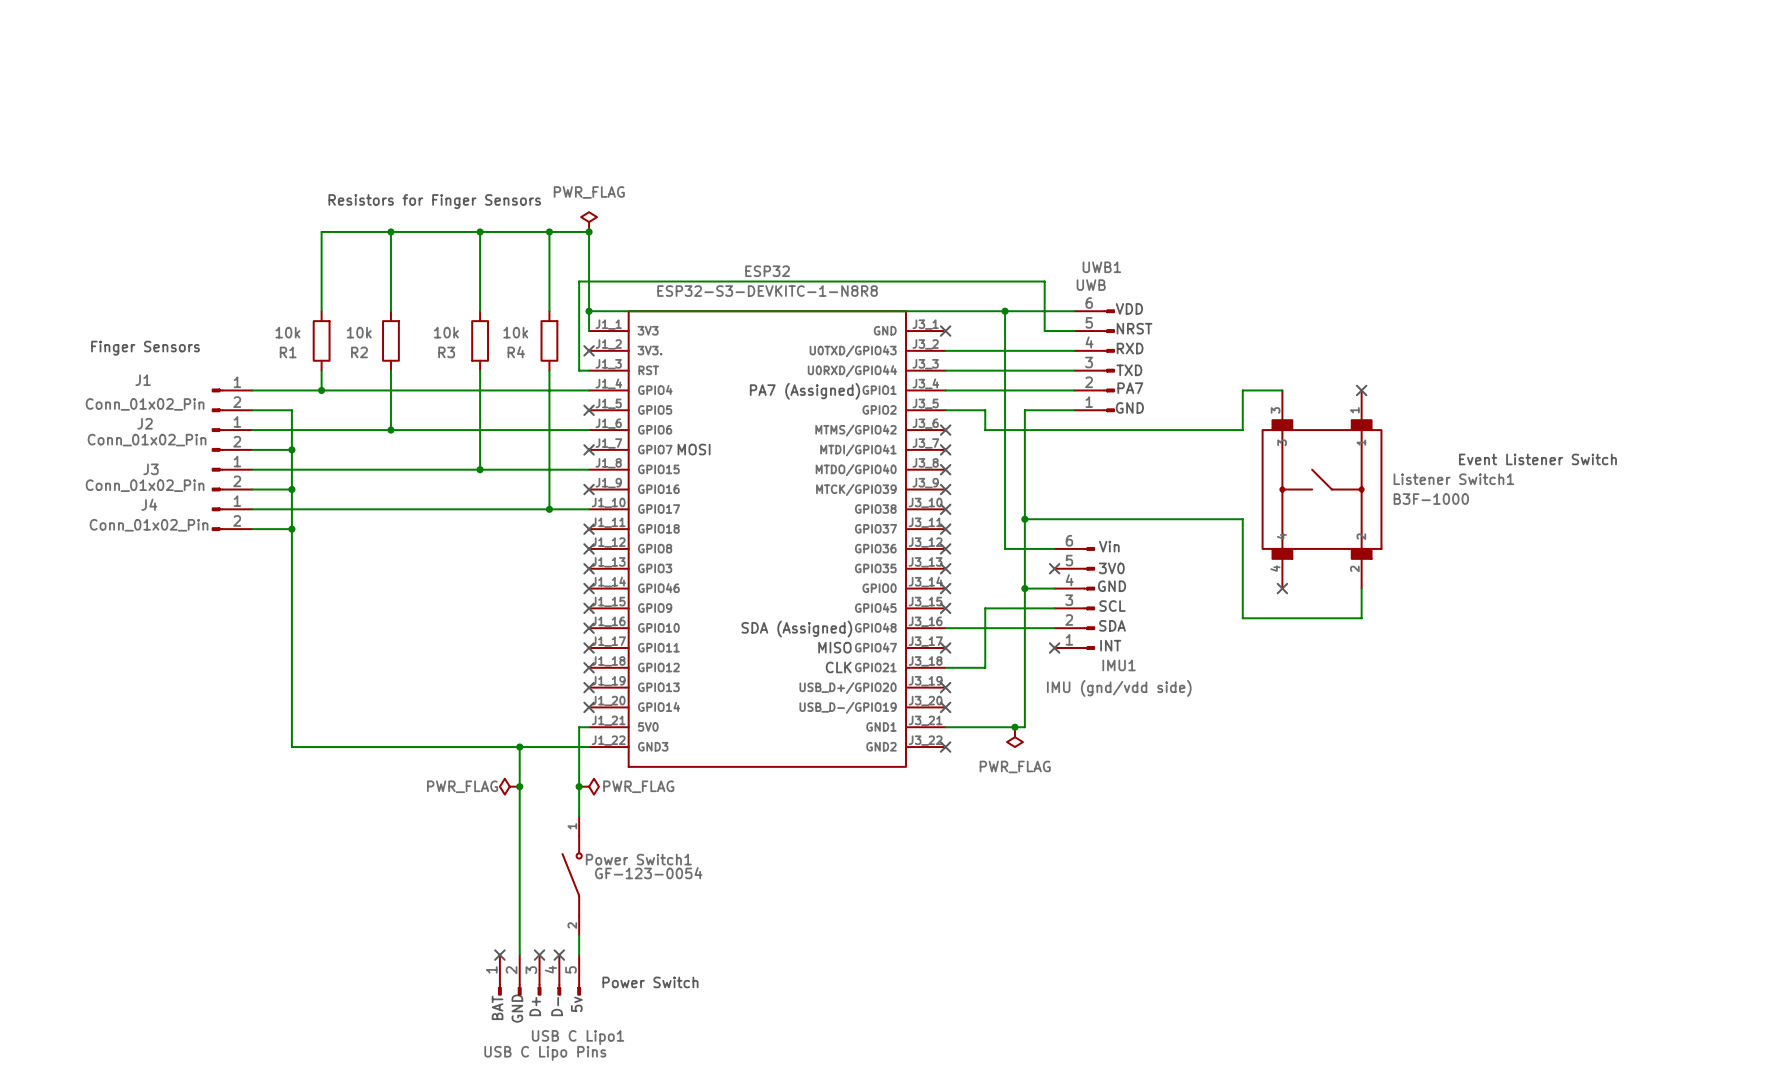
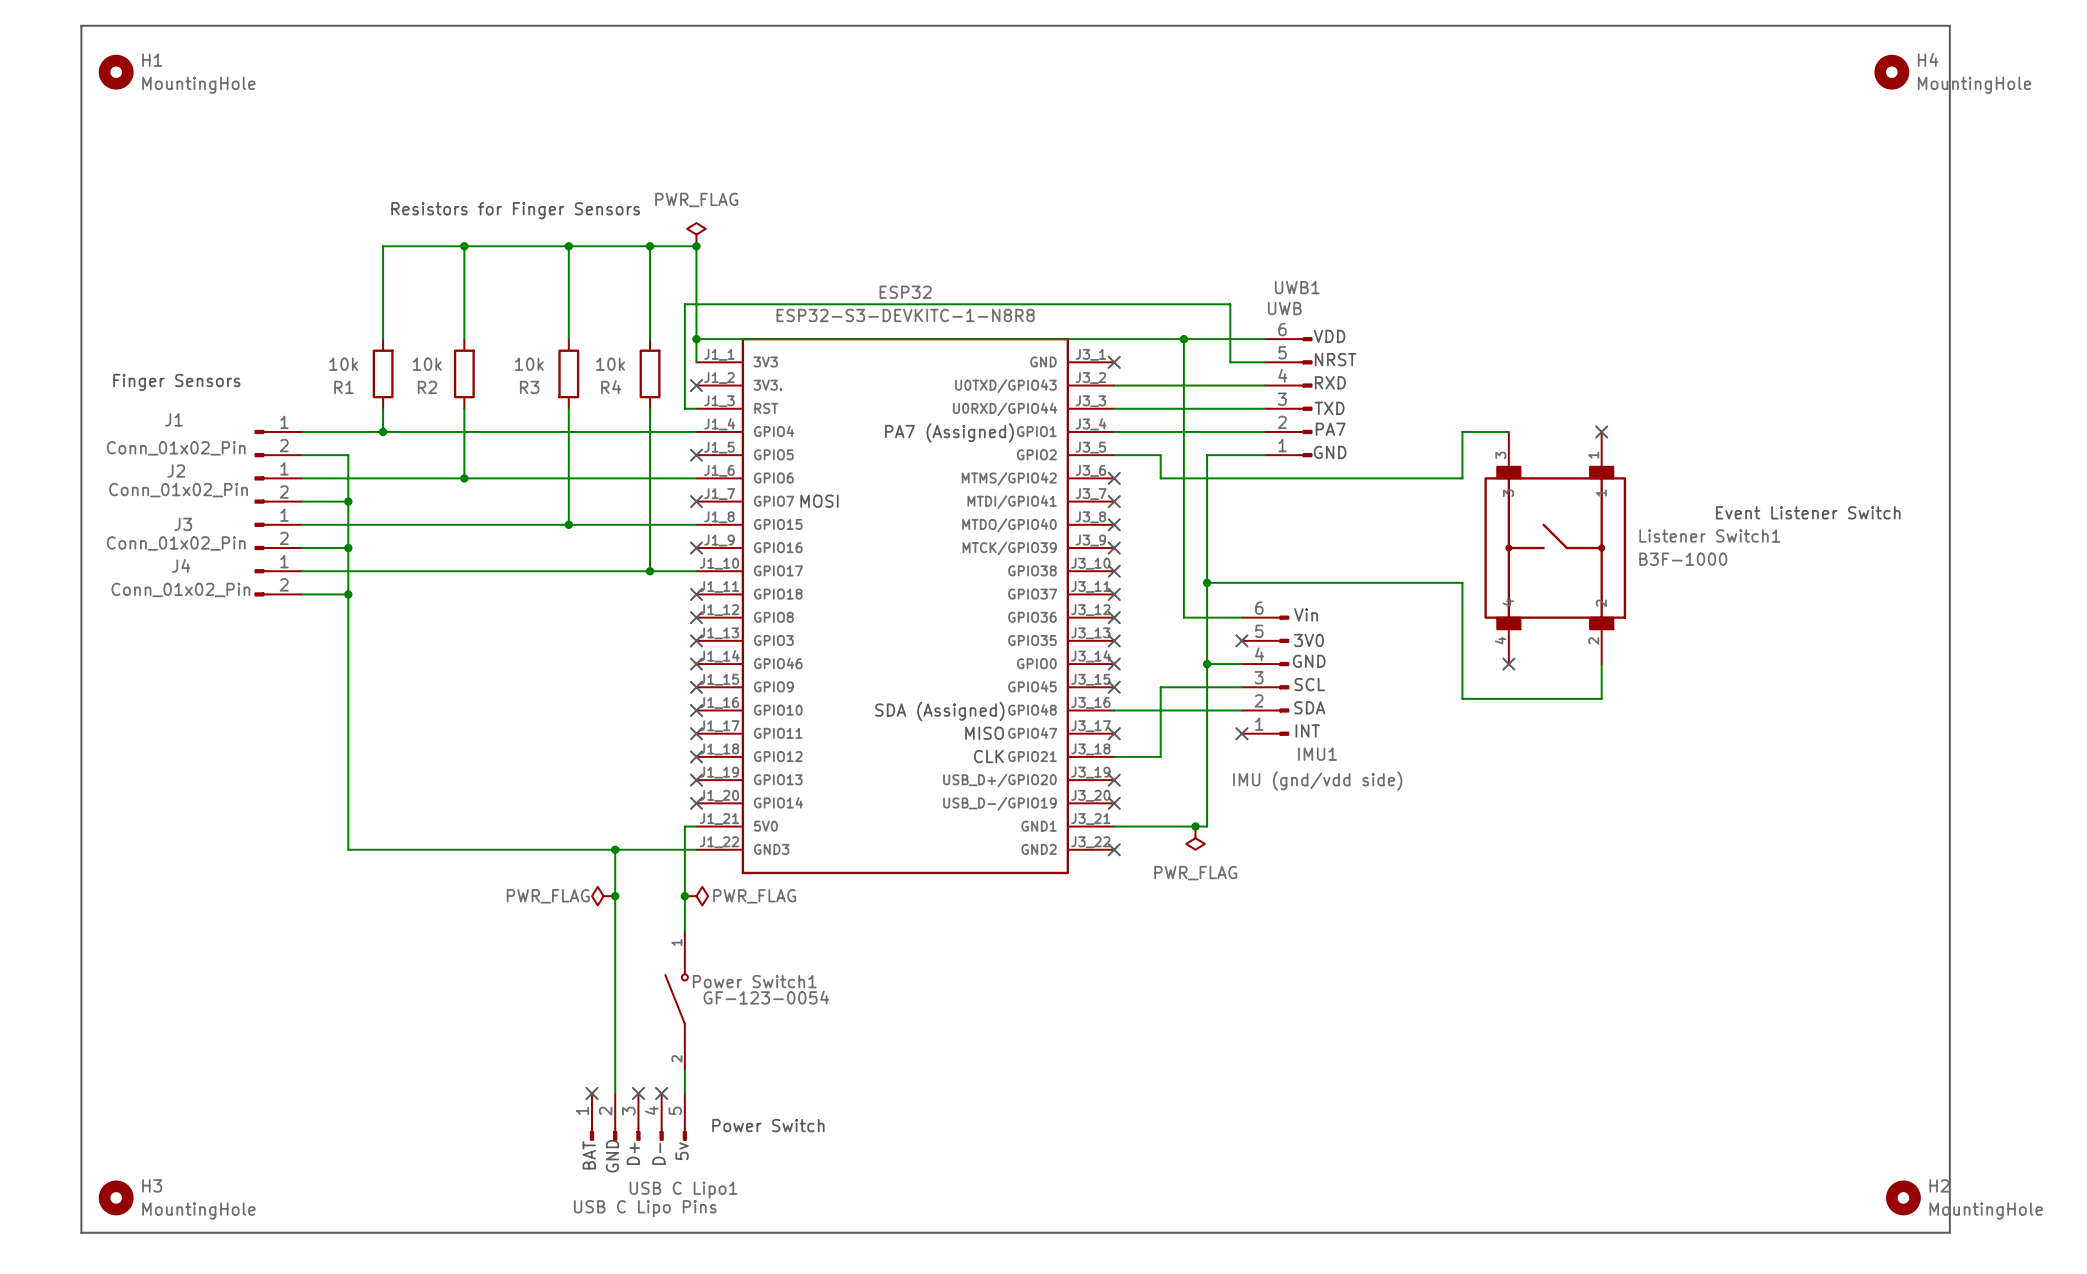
line: none -> (81, 25) (1949, 25) (1949, 1232) (81, 1232) (81, 25)
H1: none -> MountingHole (116, 72)
H4: none -> MountingHole (1891, 72)
H3: none -> MountingHole (116, 1197)
H2: none -> MountingHole (1903, 1197)

